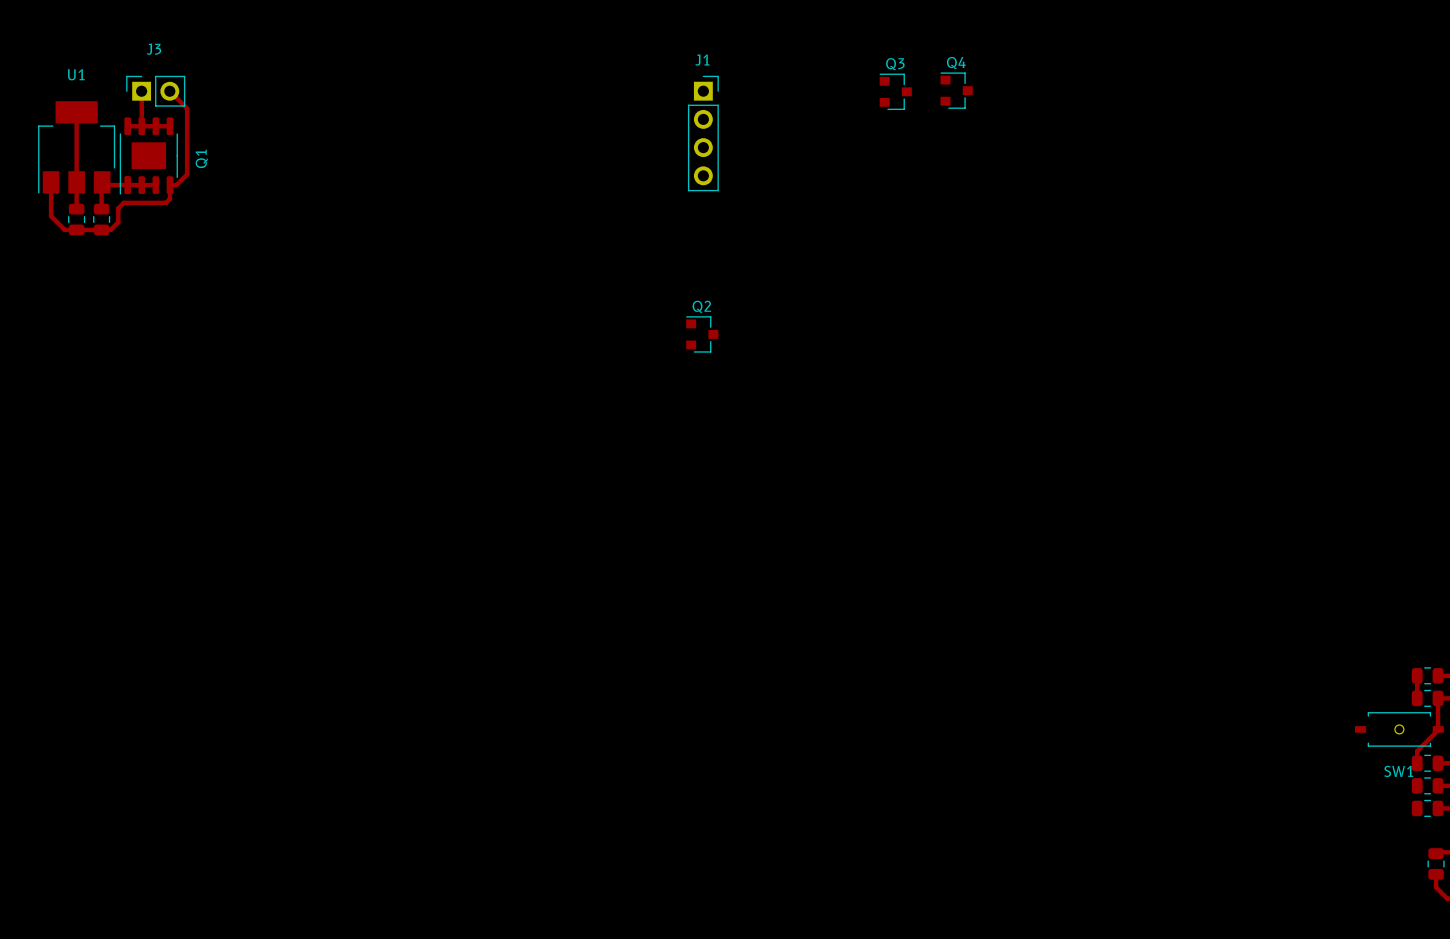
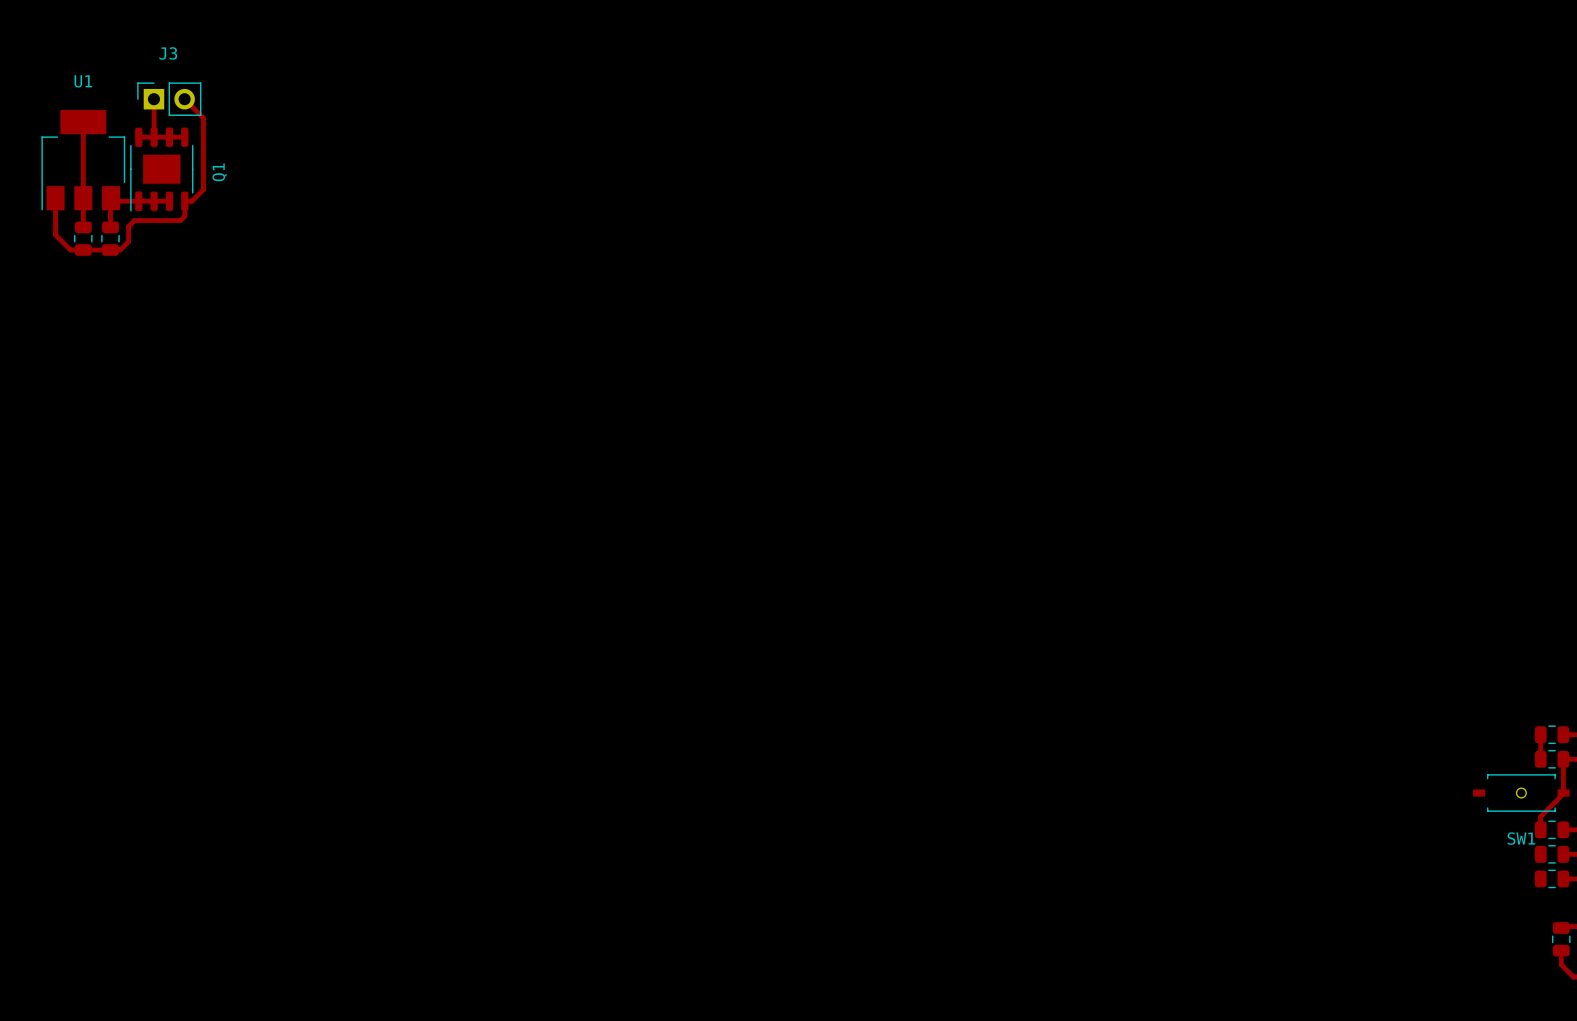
Q4: (956, 90) -> none
Q3: (895, 91) -> none
J1: (703, 133) -> none
Q2: (702, 334) -> none

